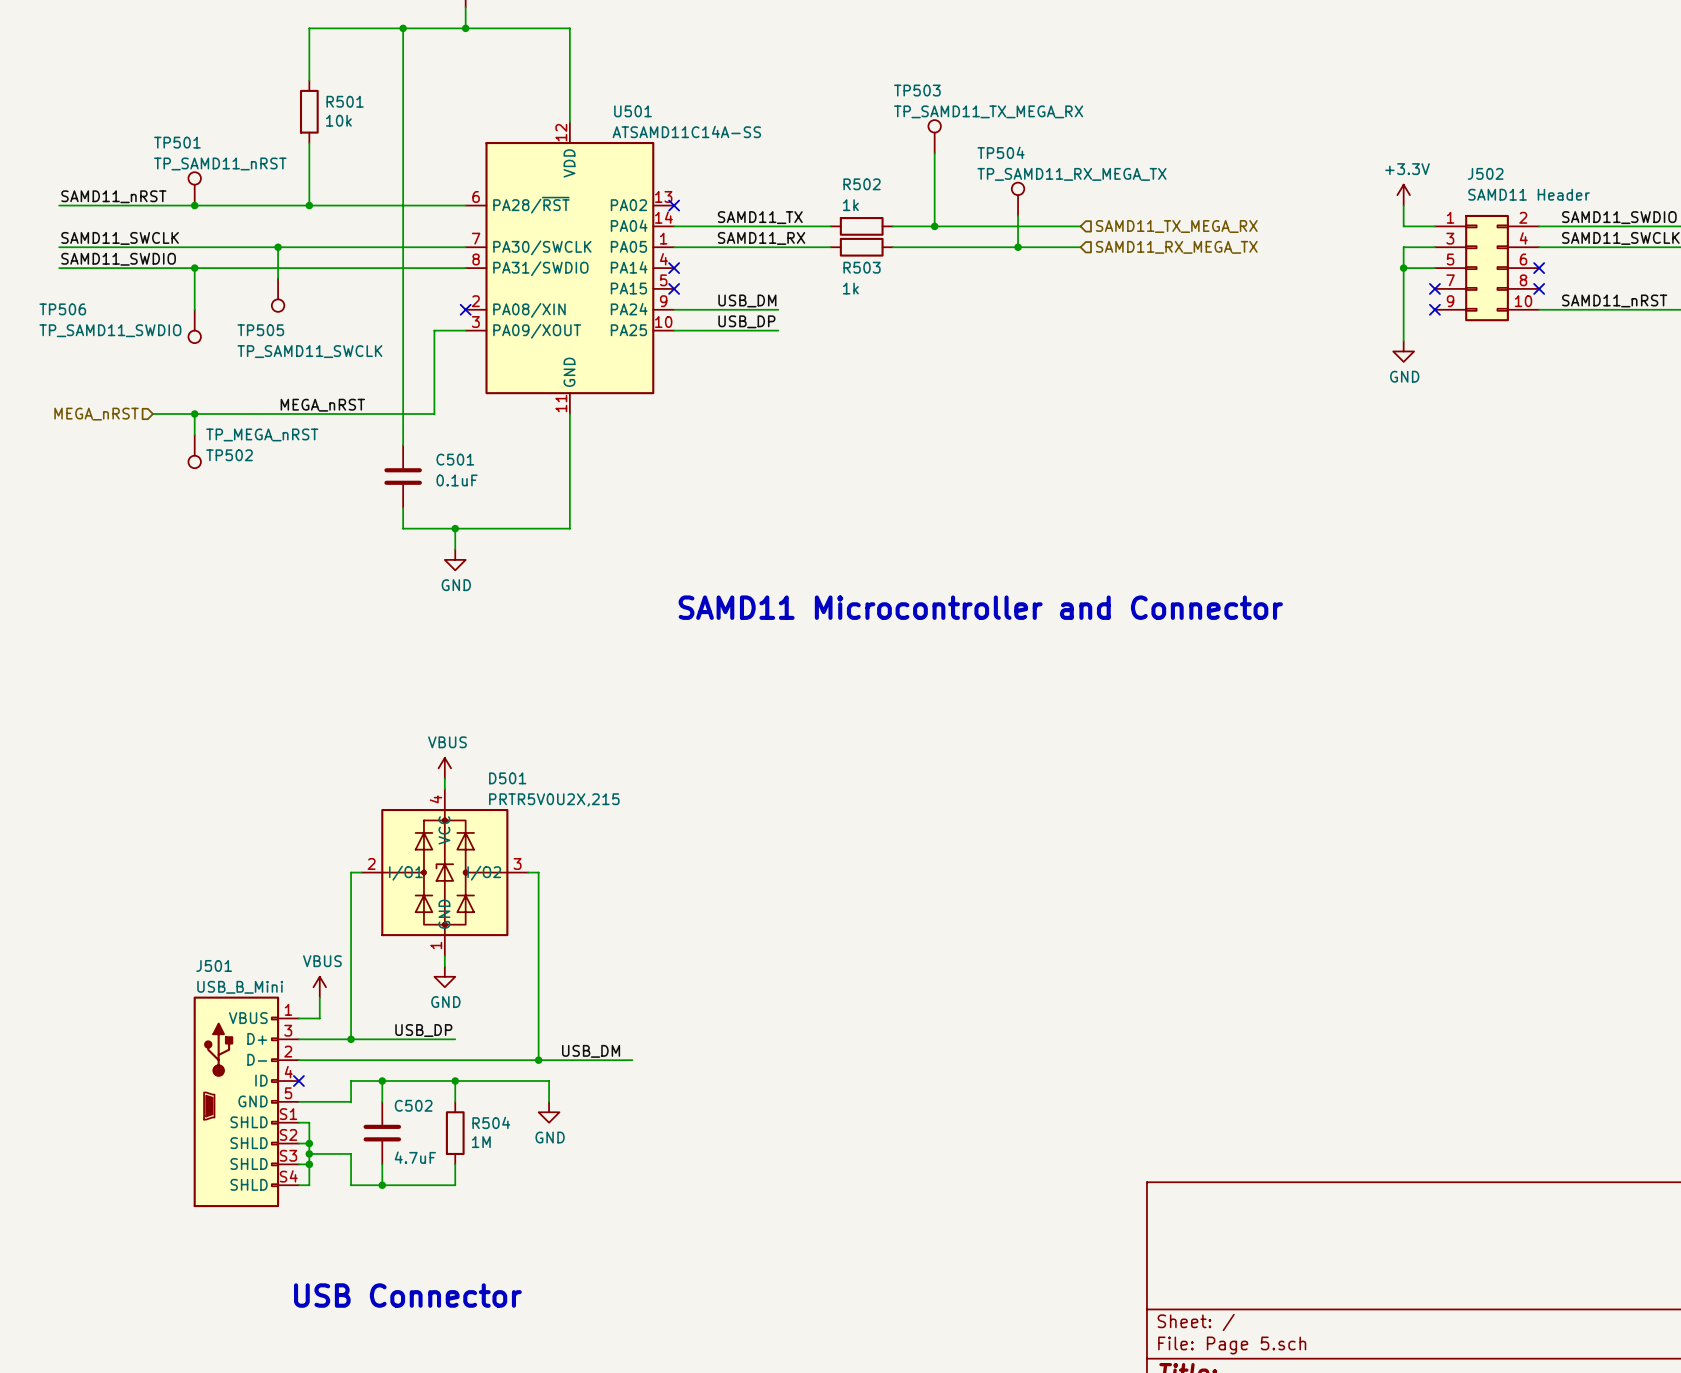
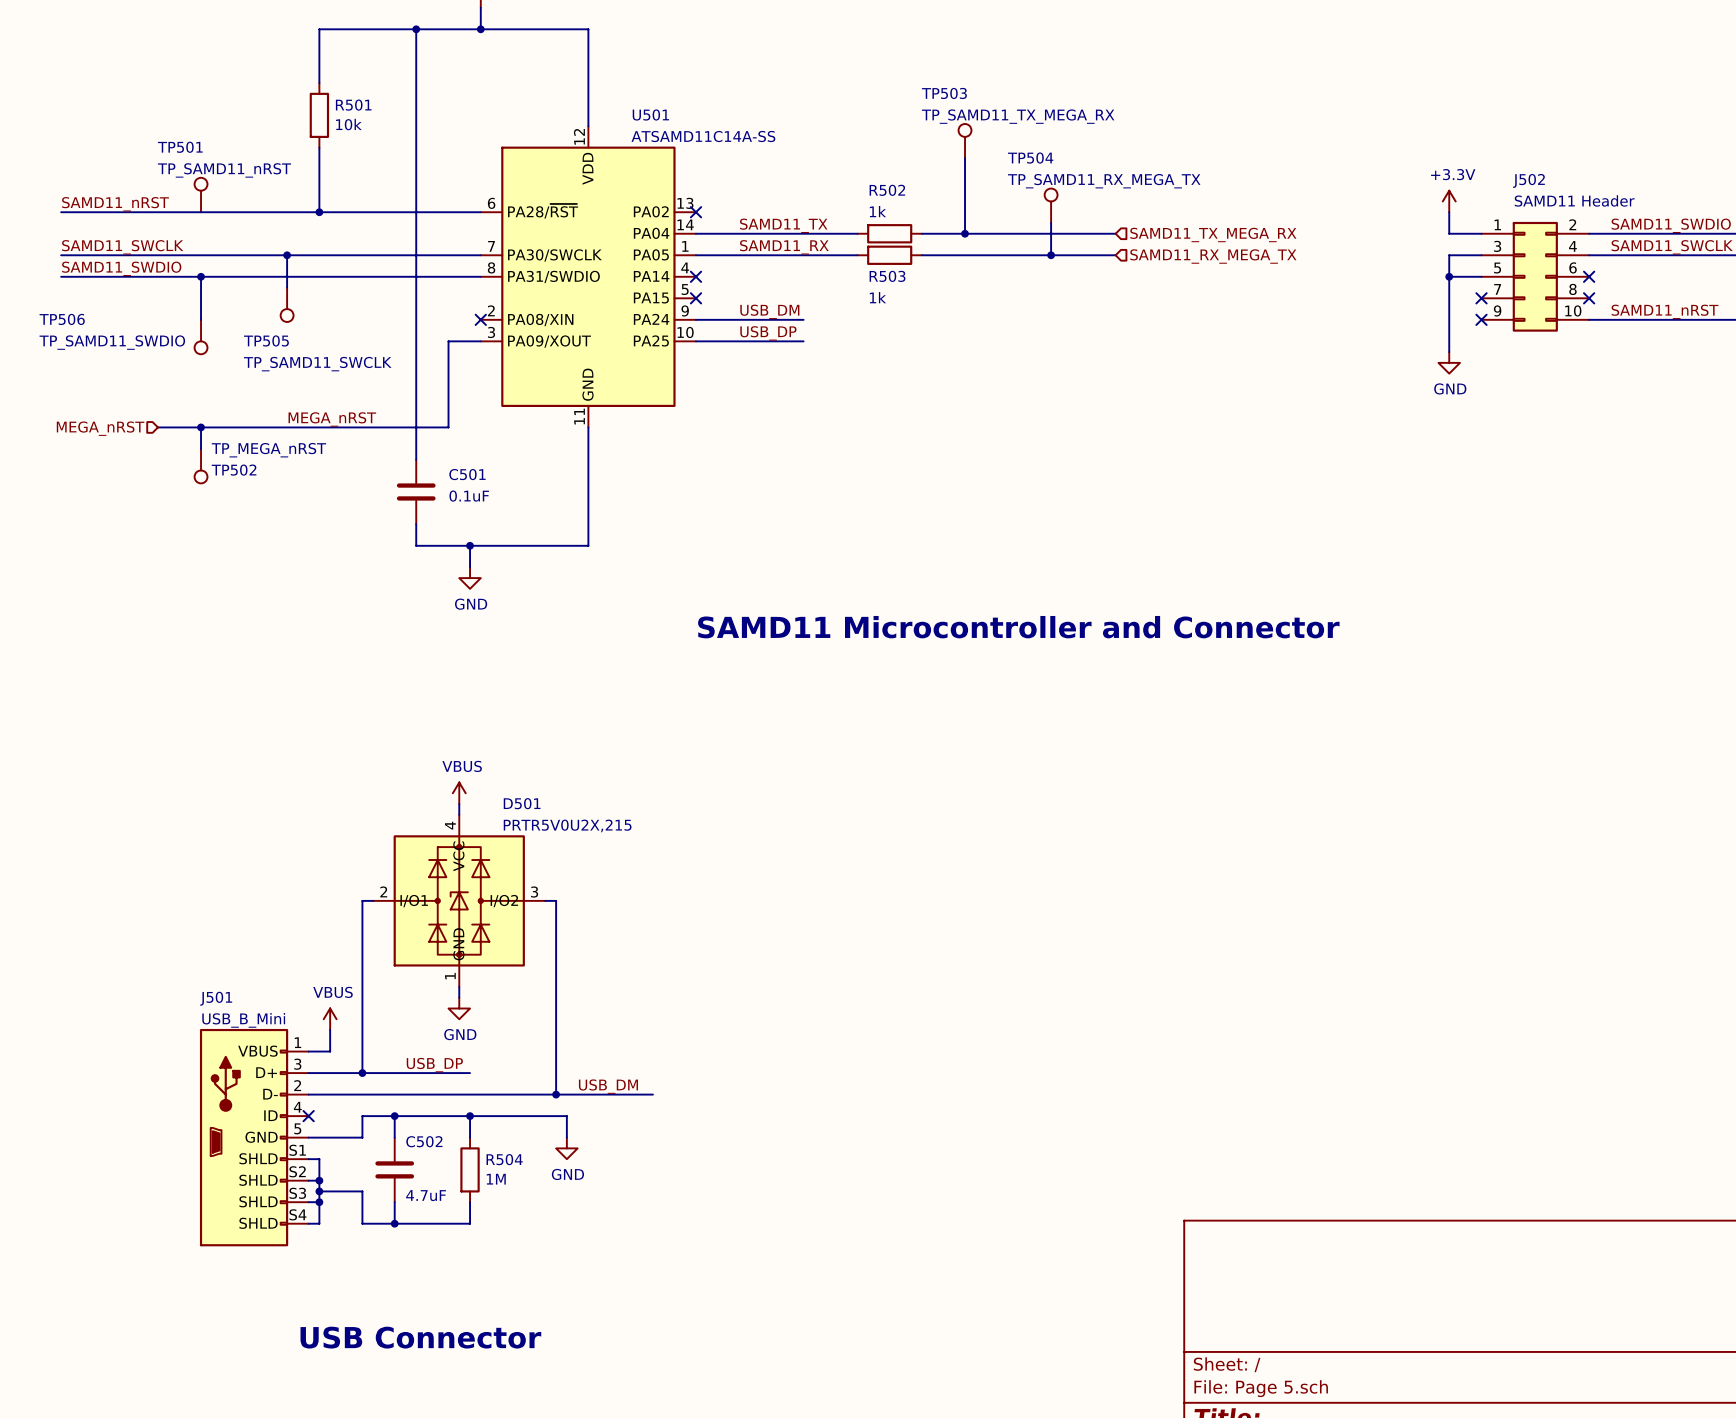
junction: (194, 205) -> none

